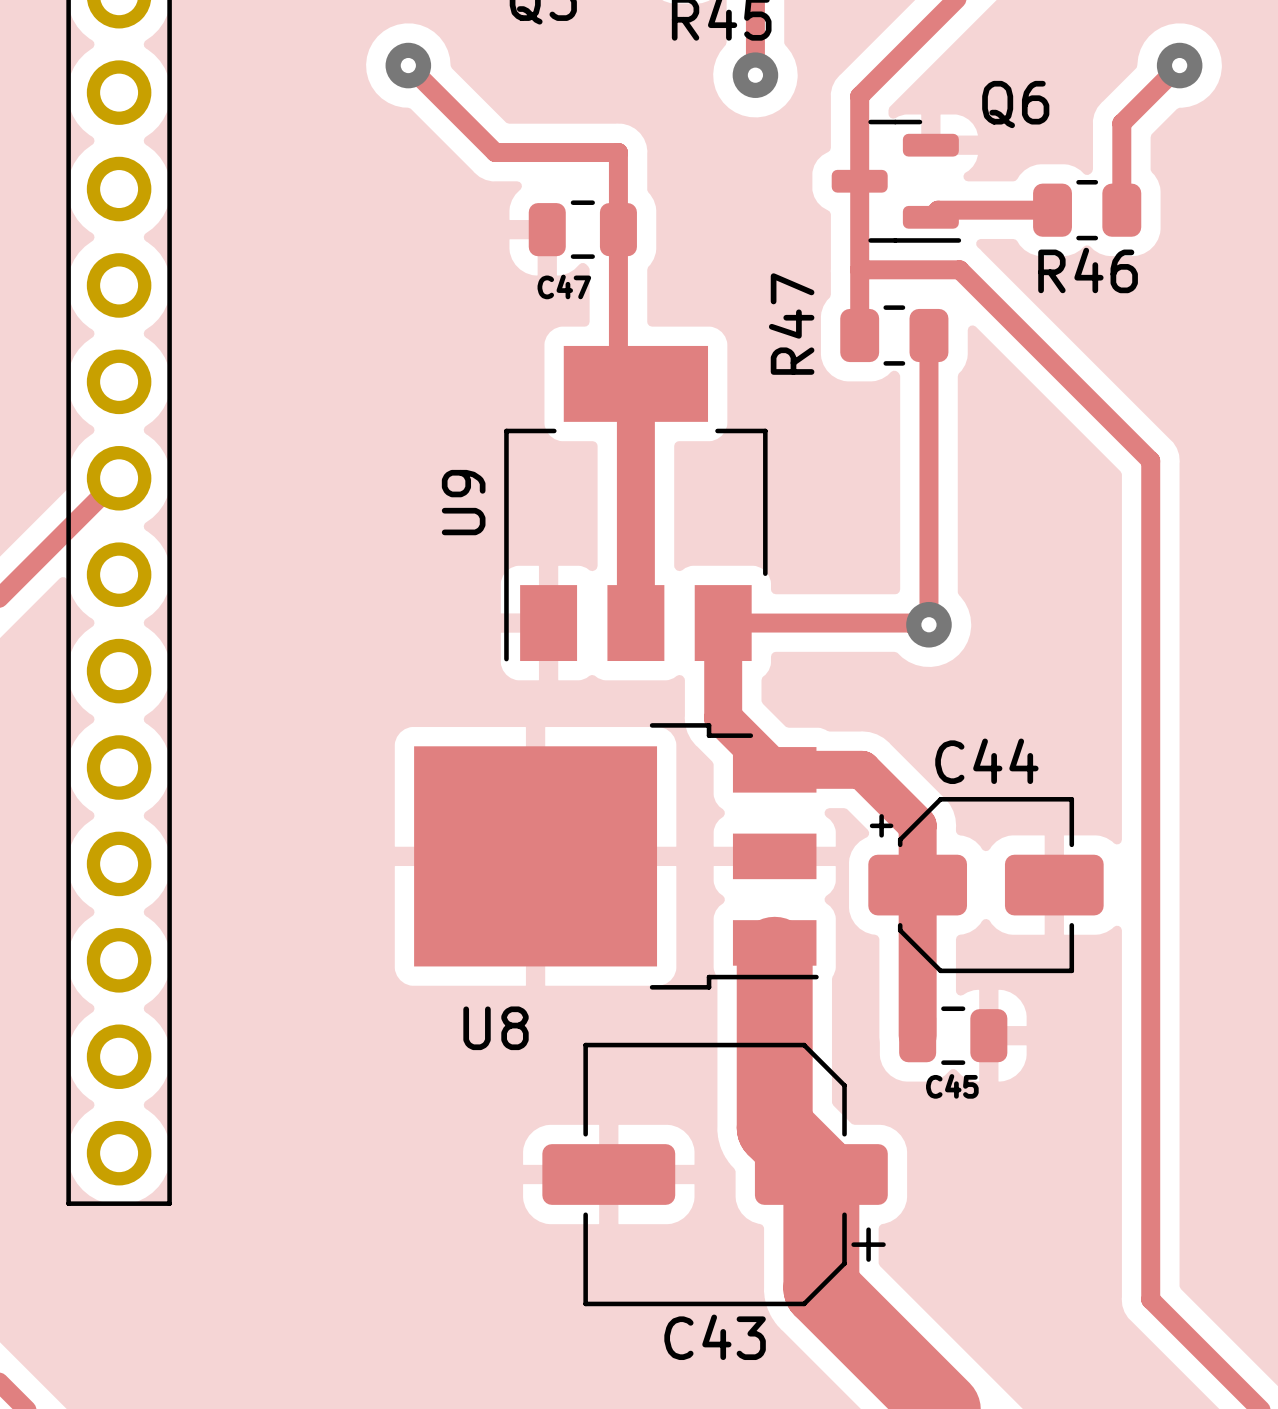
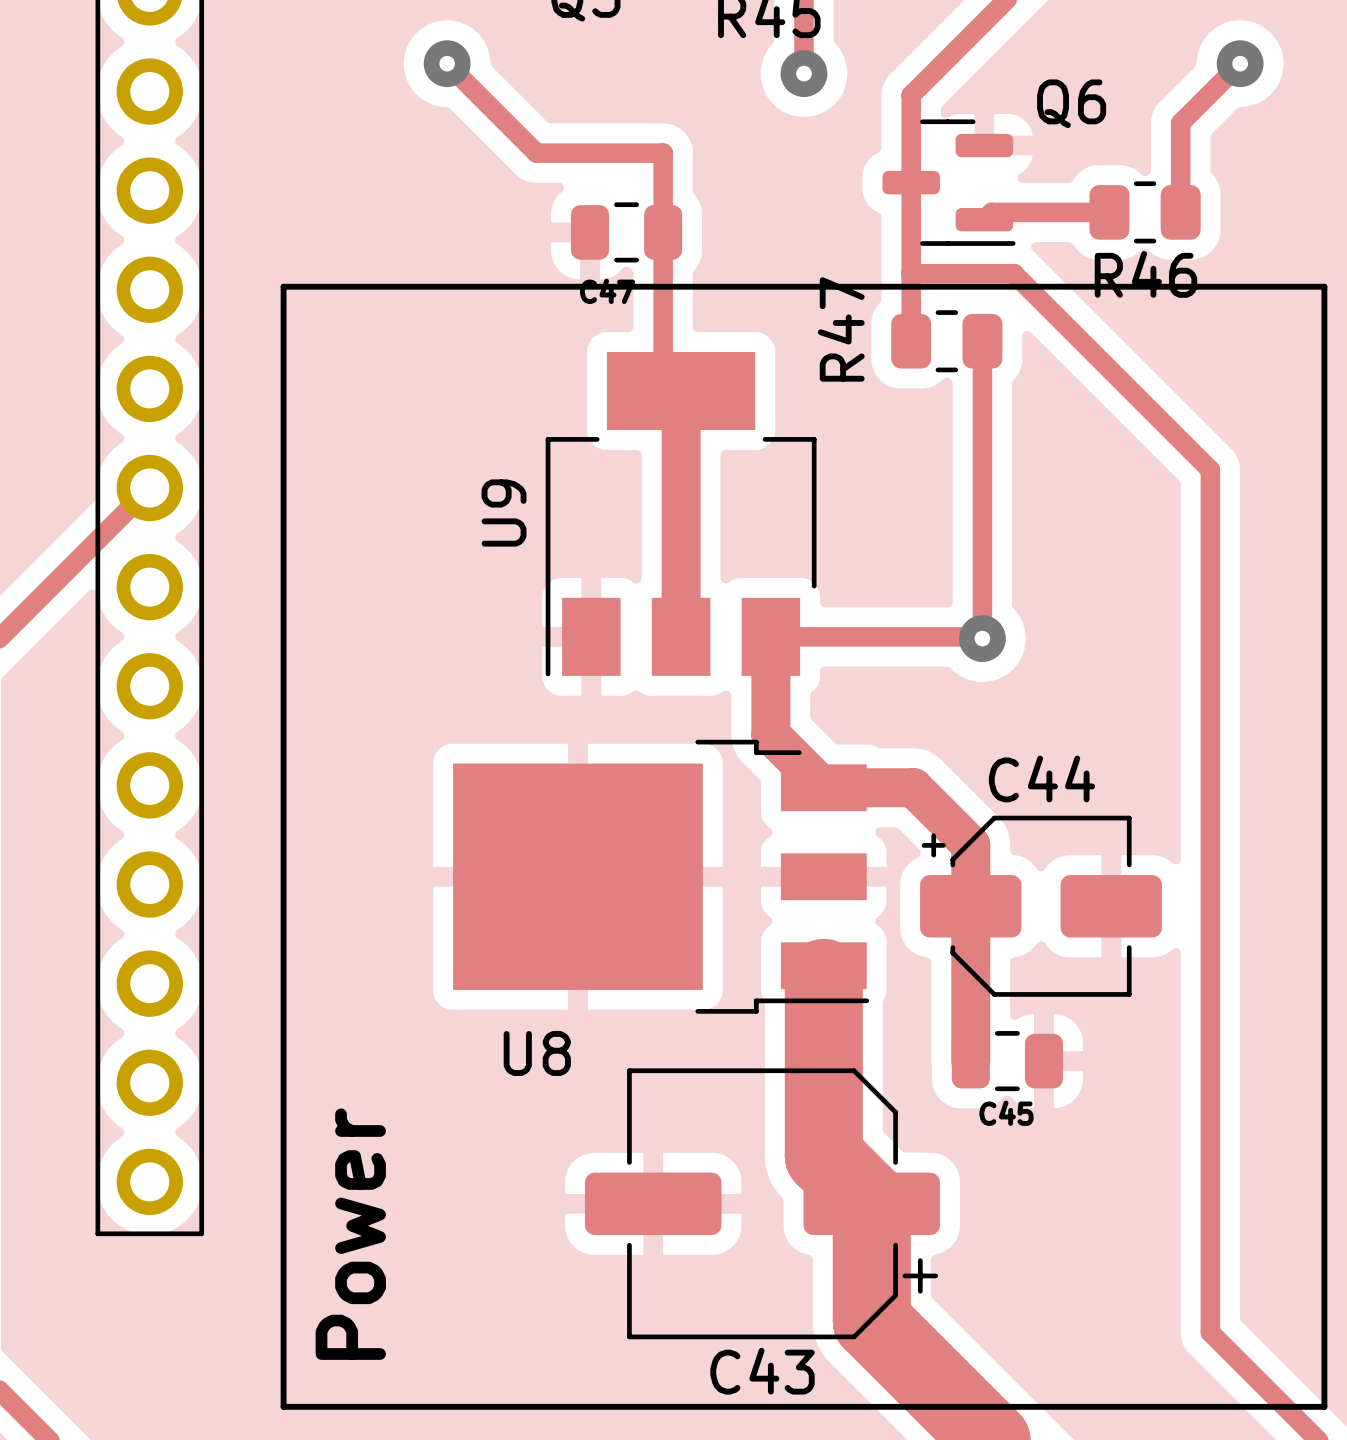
line: none -> (283, 286) (1324, 286) (1324, 1406) (283, 1406) (283, 286)
text: none -> Power (350, 1234)

